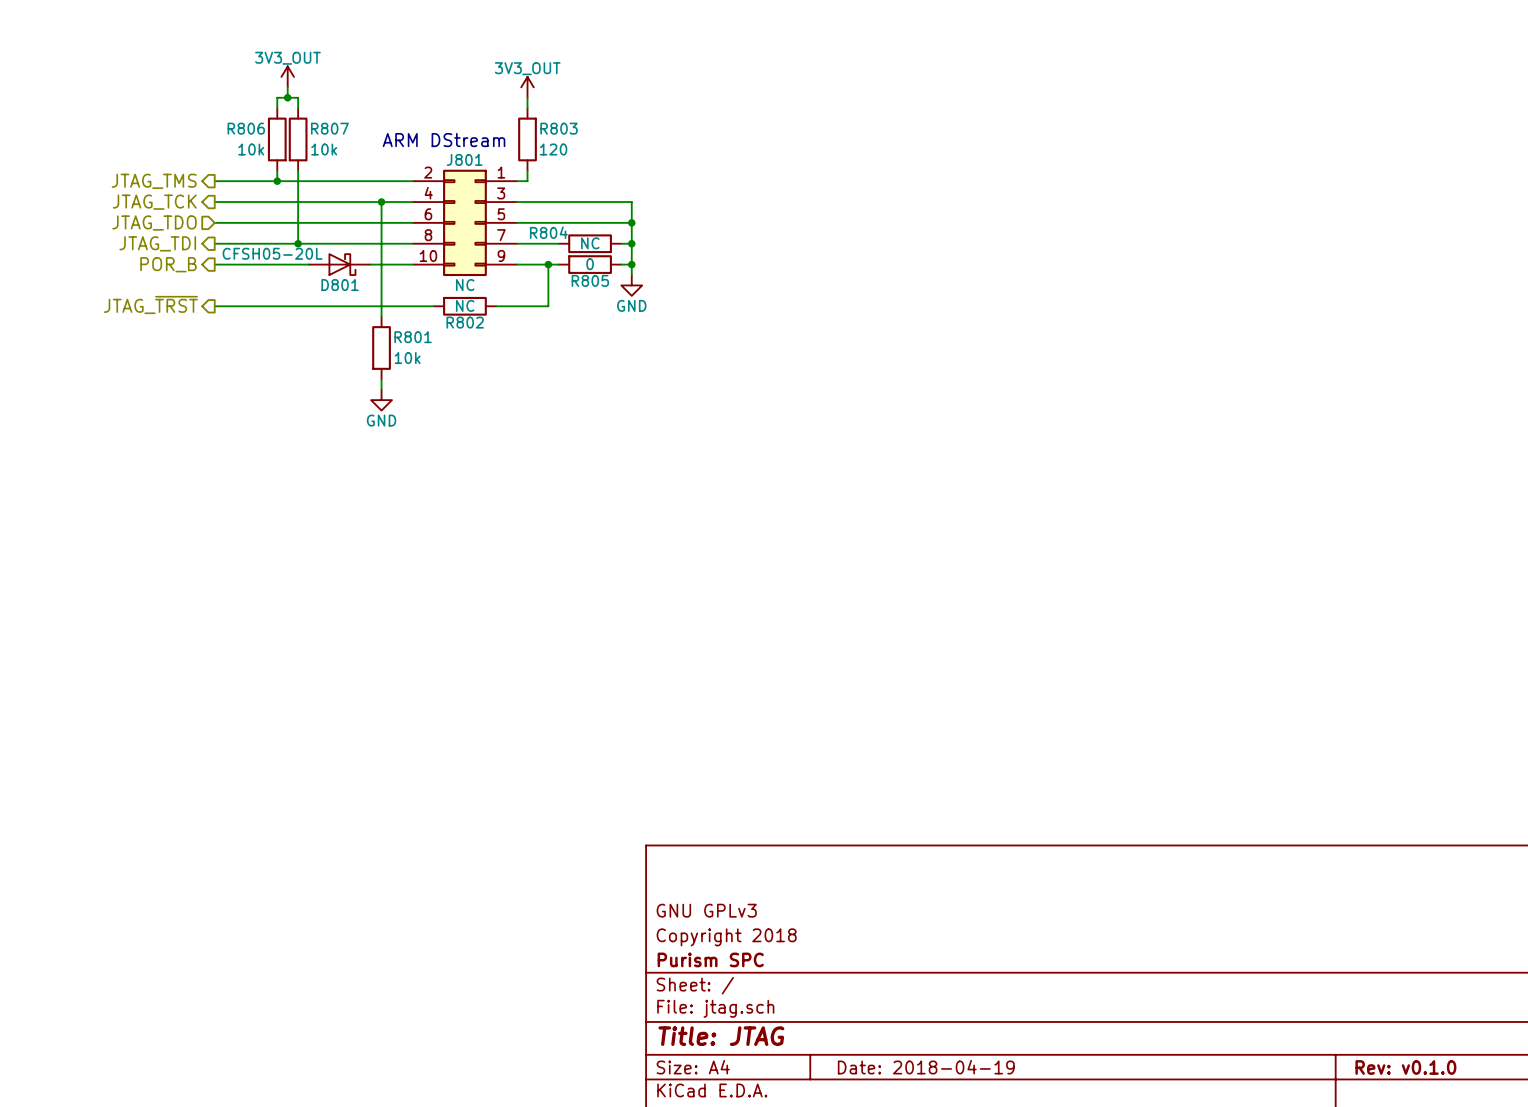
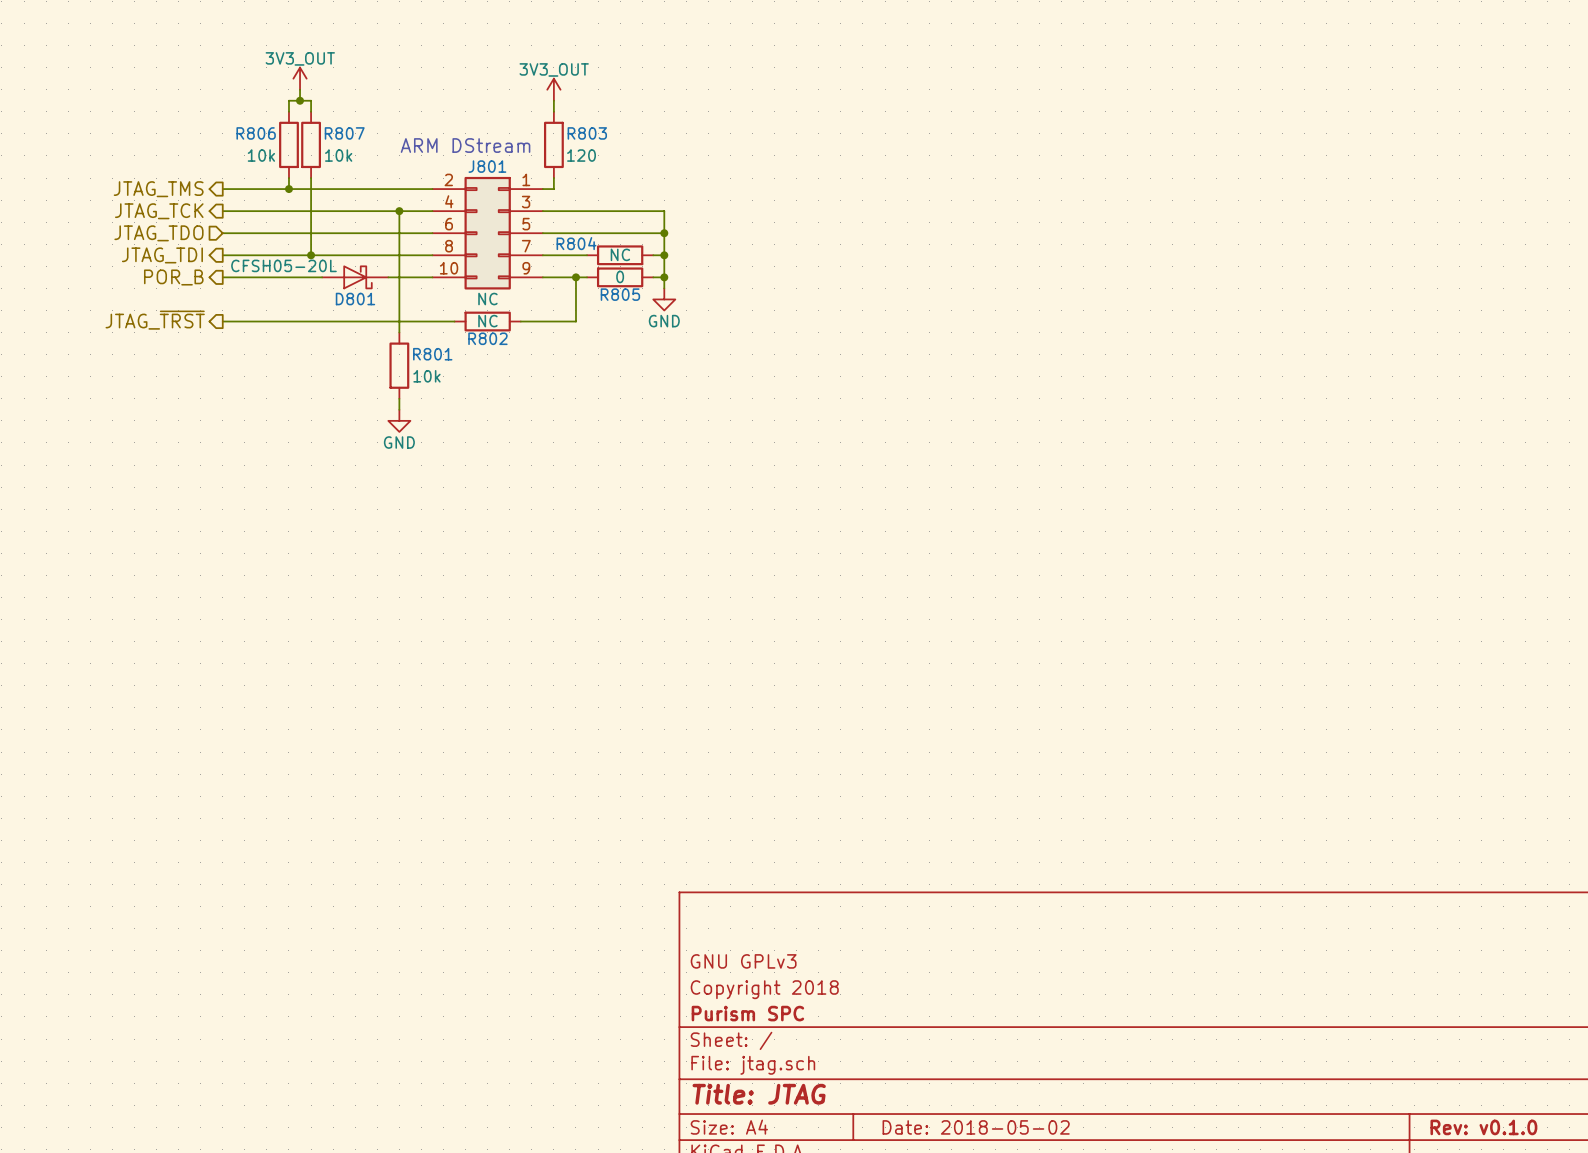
title block: Date: 2018-04-19 (926, 1067) -> Date: 2018-05-02 (976, 1127)

